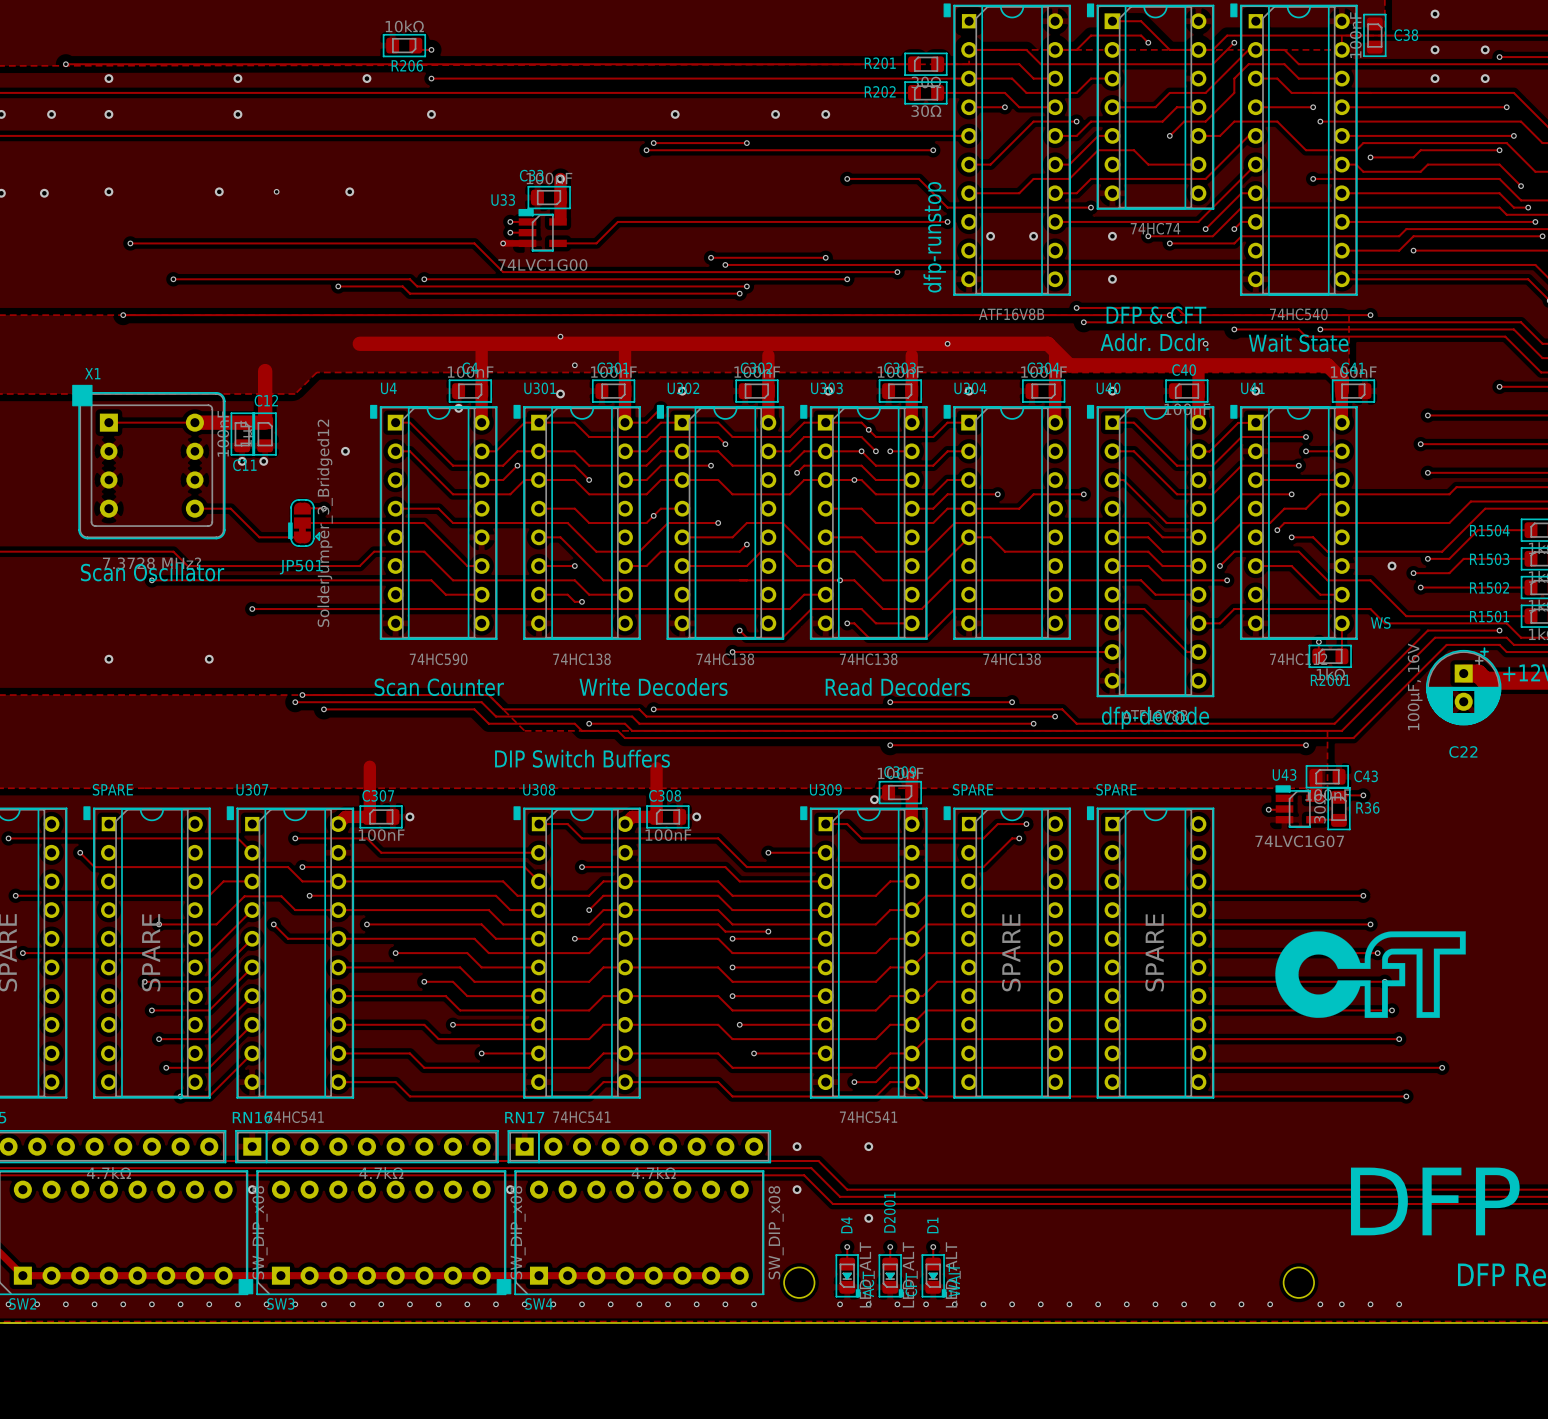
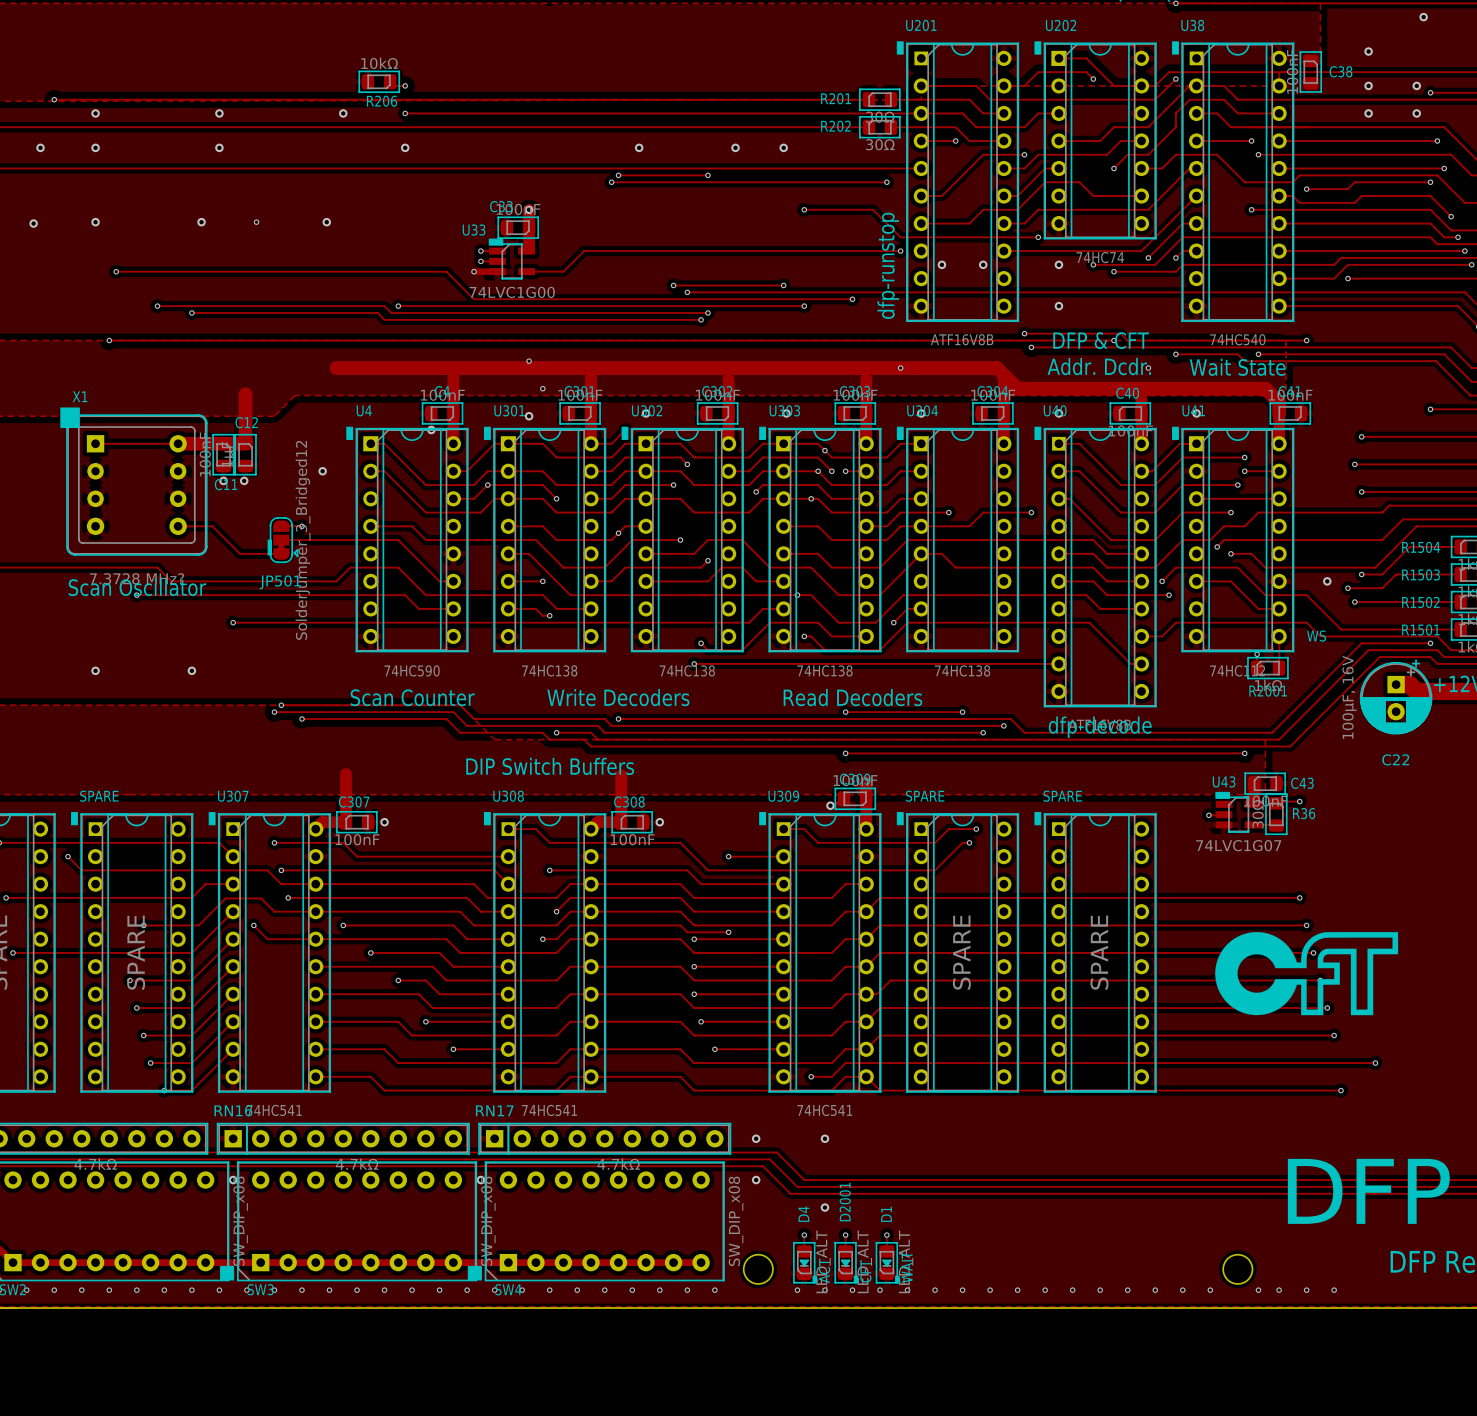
track: none -> (191, 313) (315, 313)
via: none -> (191, 313)
via: (338, 286) -> none
track: none -> (921, 608) (907, 608) (893, 622)
via: none -> (893, 622)

